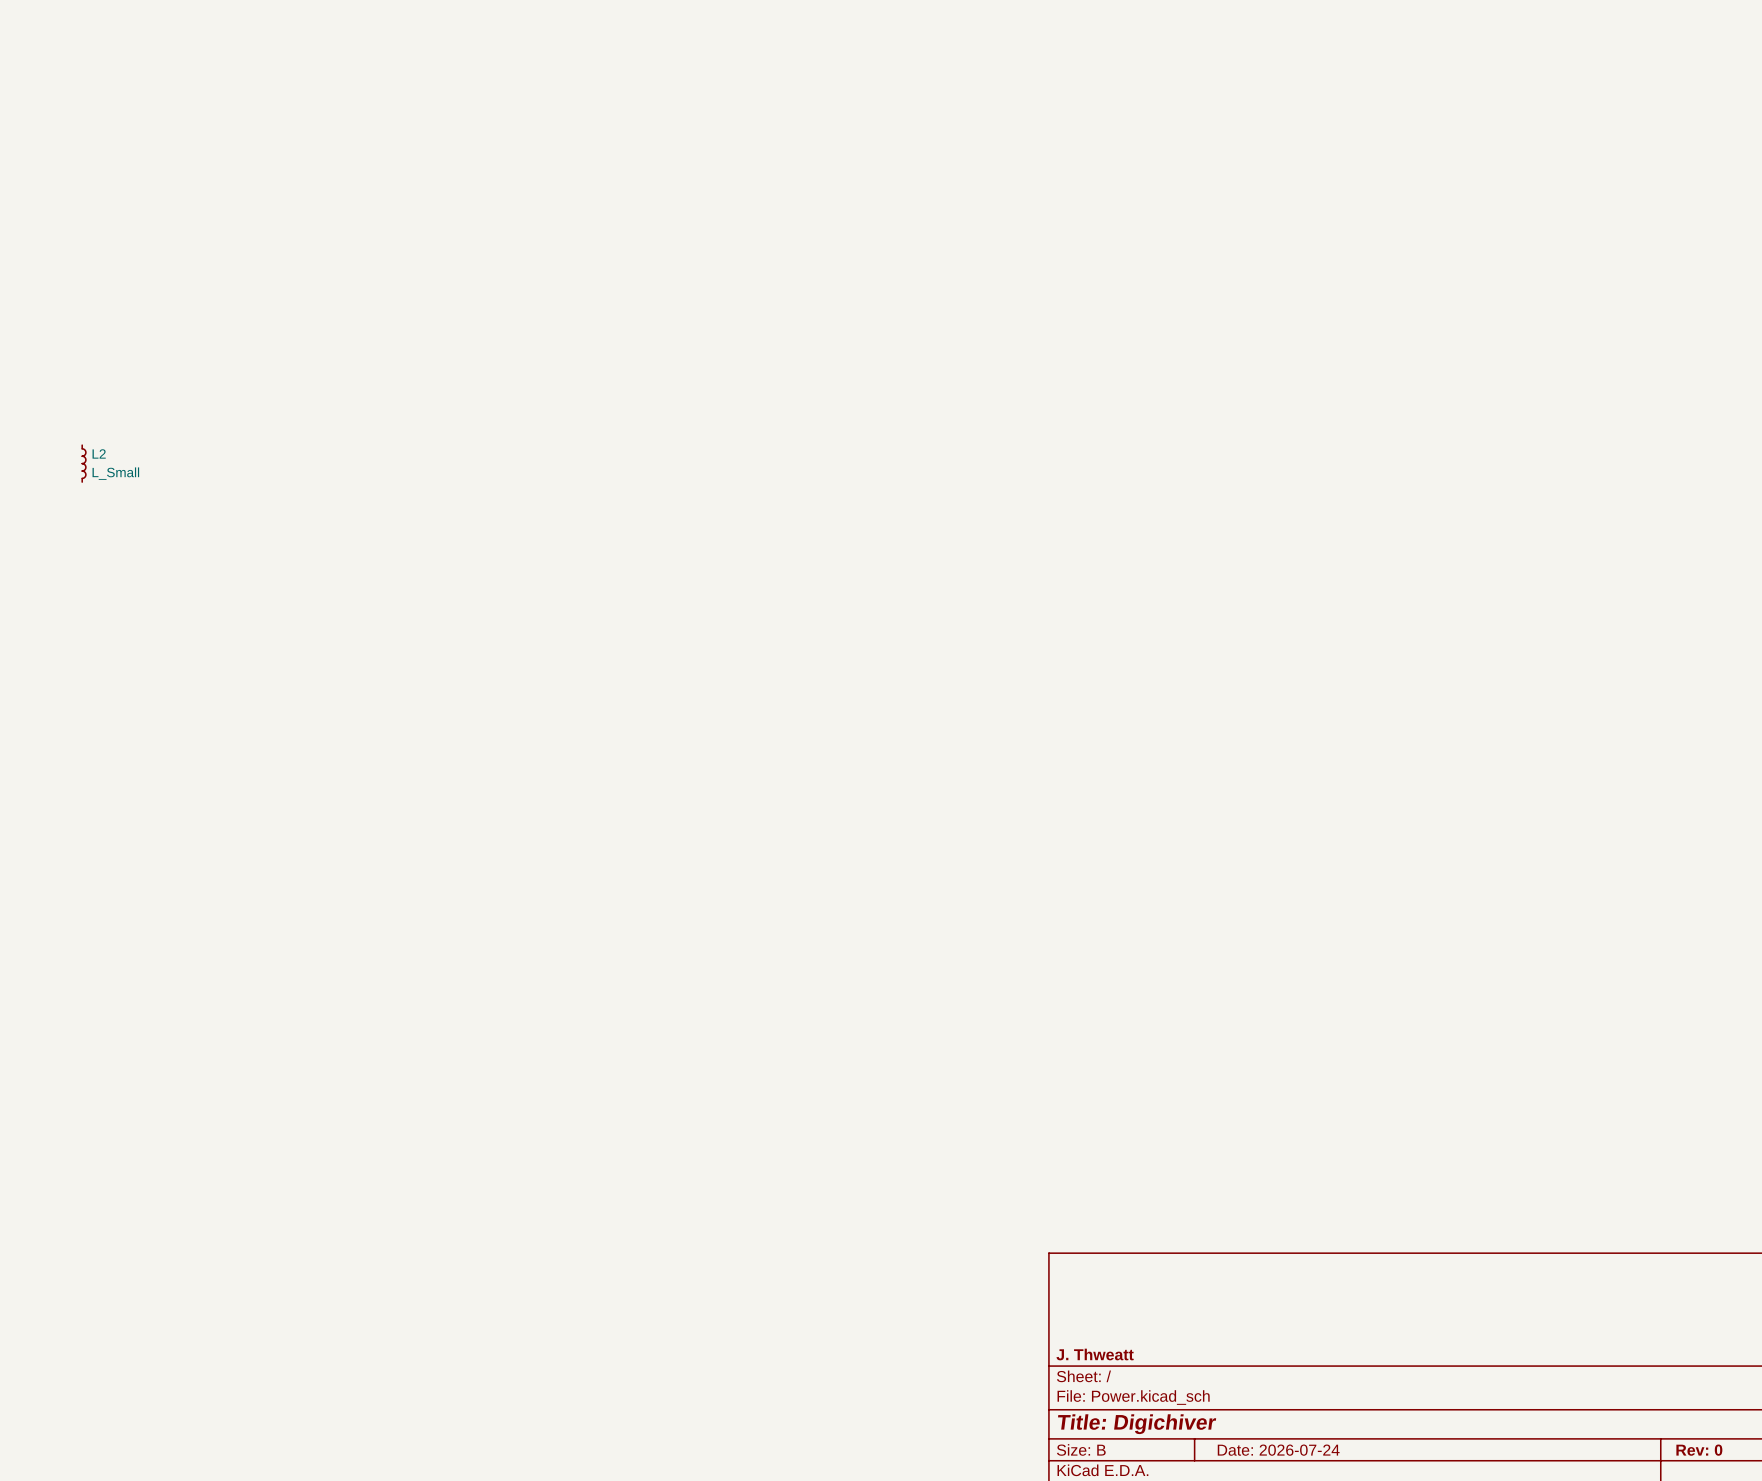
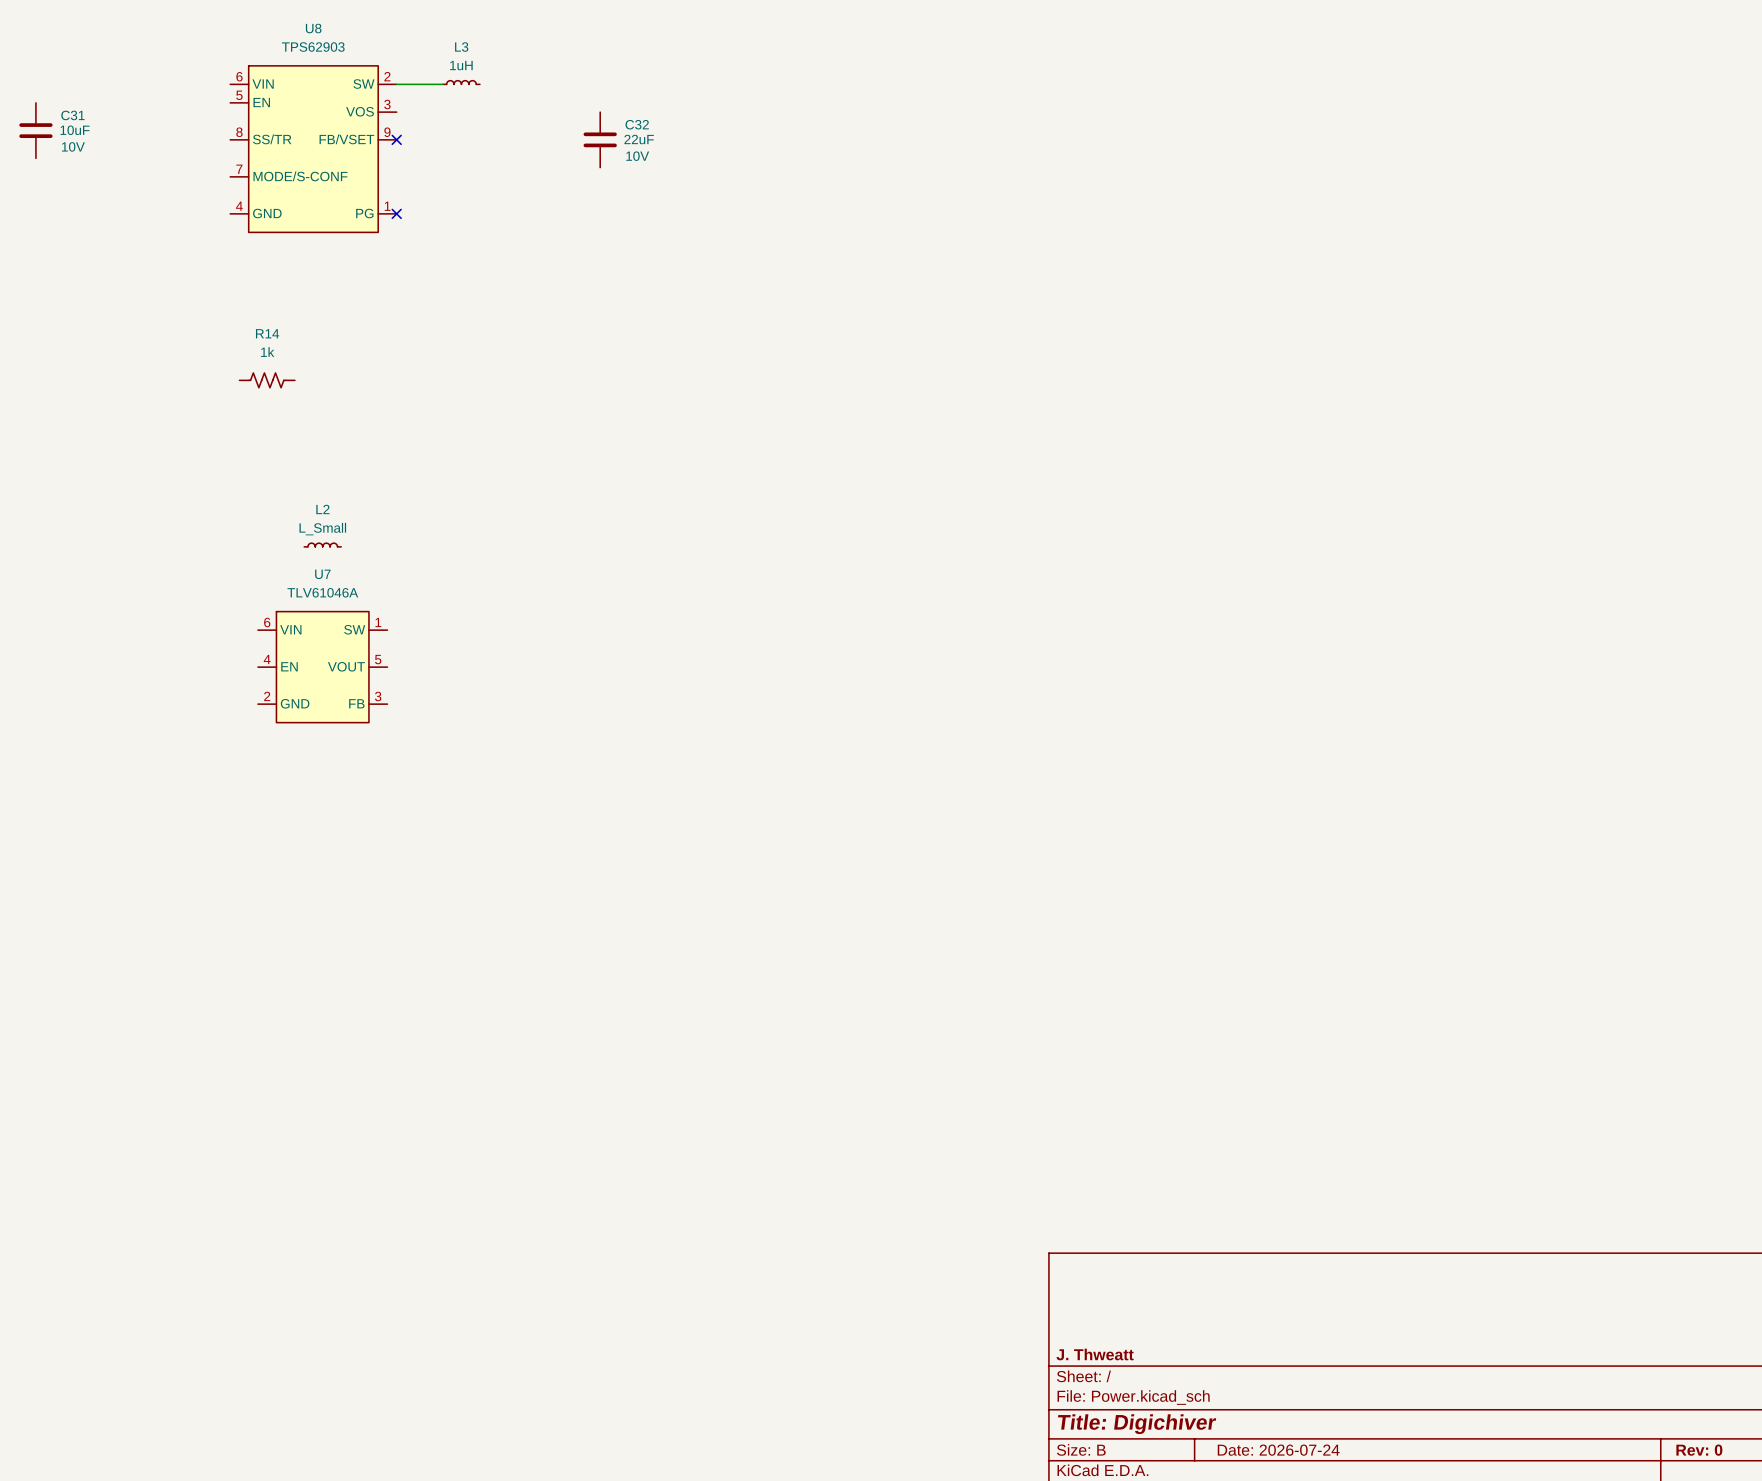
L3: none -> 1uH (461, 82)
wire: none -> (396, 84) (442, 84)
C31: none -> 10uF (35, 130)
no-connect mark: none -> (396, 139)
C32: none -> 22uF (600, 139)
U8: none -> TPS62903 (313, 149)
no-connect mark: none -> (396, 213)
R14: none -> 1k (267, 380)
L2 name position: L2 (99, 453) -> L2 (322, 509)
L2 rotation: 0° (84, 463) -> 90° counterclockwise (322, 545)
L2 position: (84, 463) -> (322, 545)
L2 value position: L_Small (115, 473) -> L_Small (322, 529)
U7: none -> TLV61046A (322, 667)

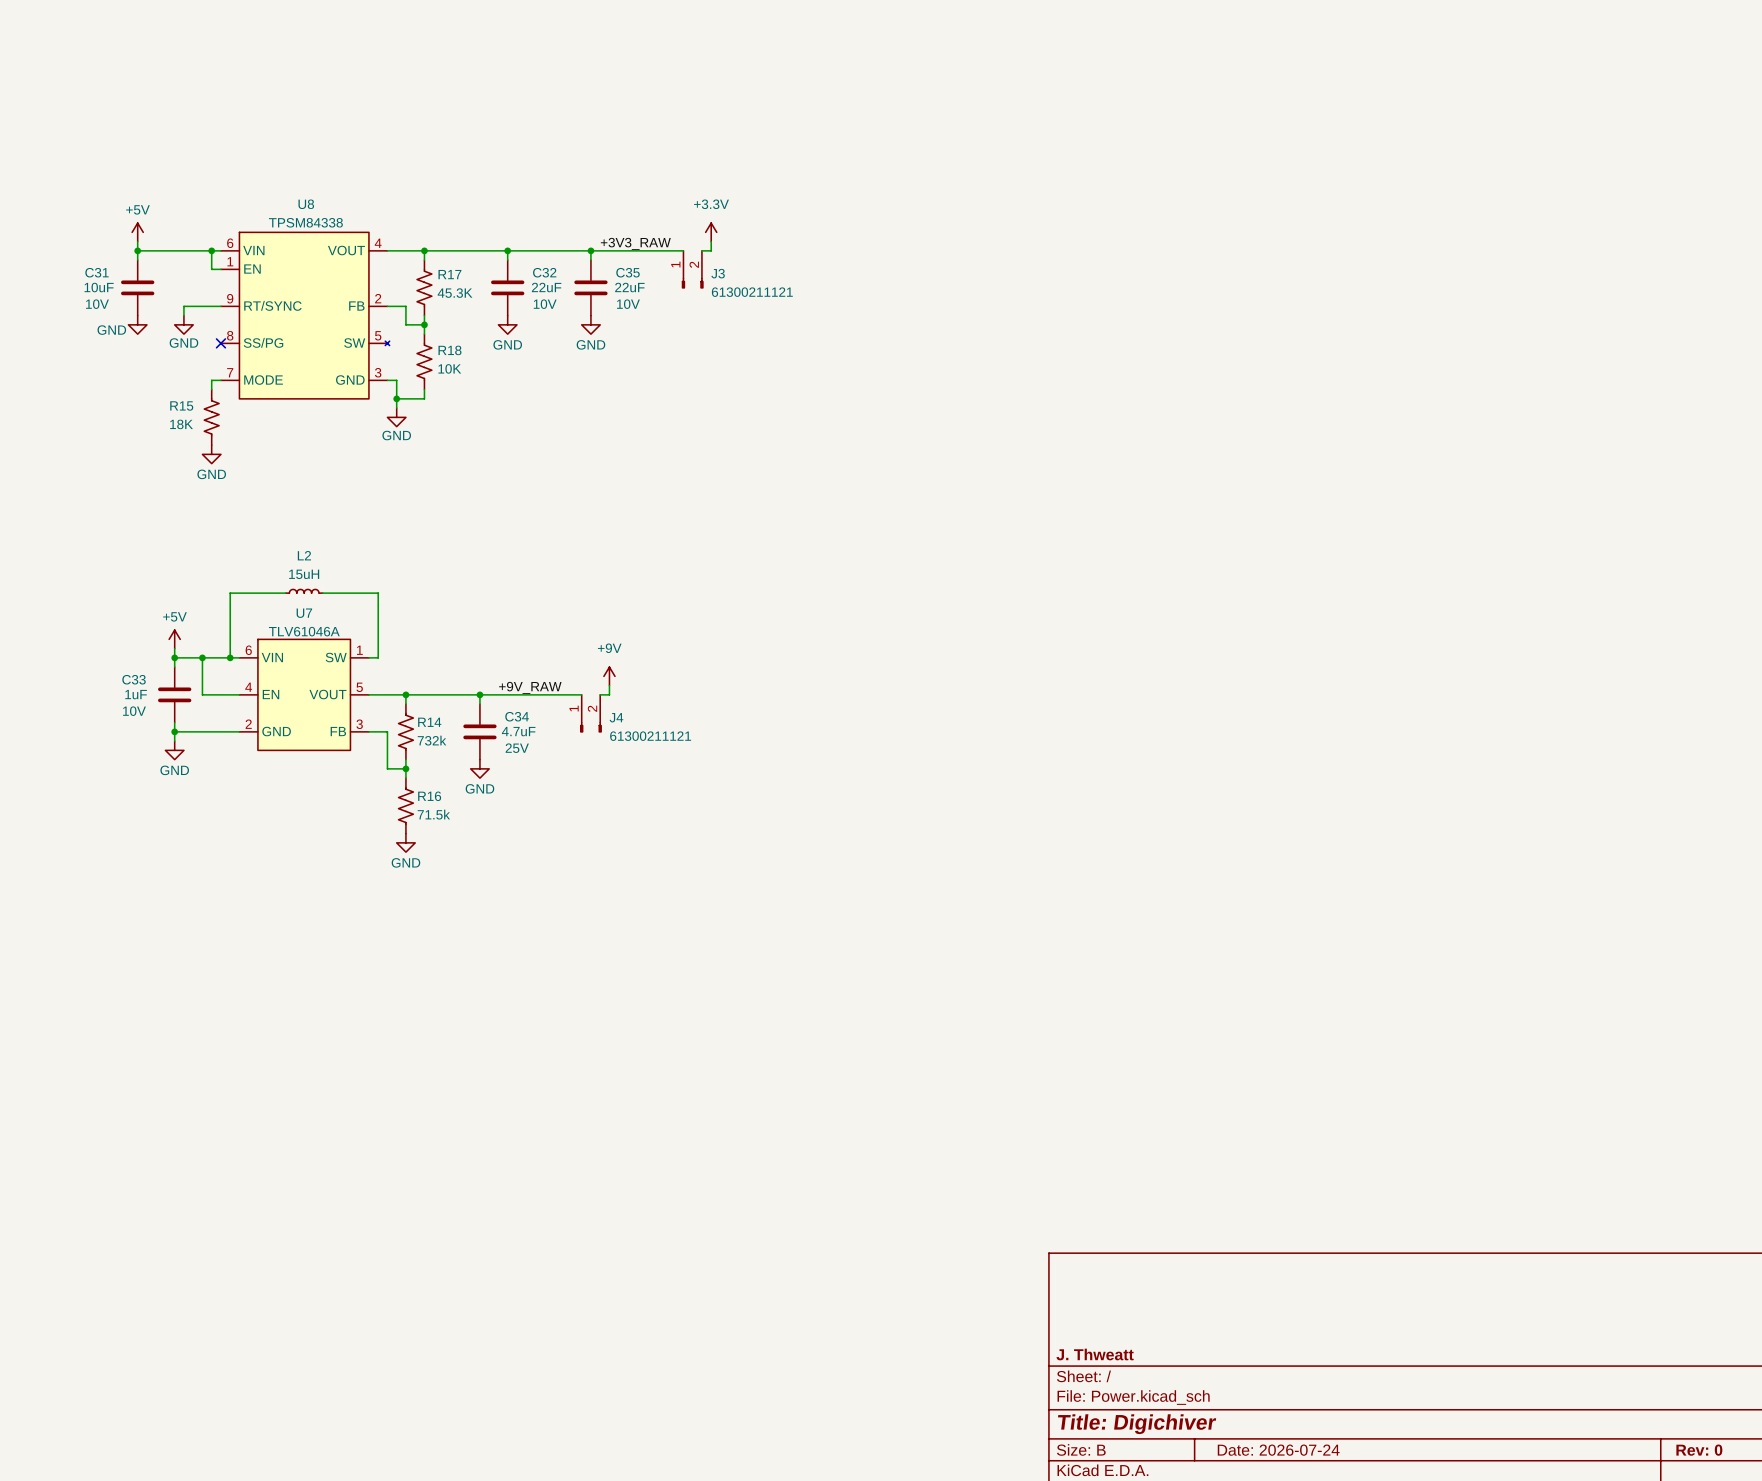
U8 value: TPS62903 (313, 47) -> TPSM84338 (305, 222)
U8 symbol: [230, 65, 397, 233] -> [220, 232, 390, 399]
L3: 1uH (461, 82) -> none
wire: (396, 84) (442, 84) -> none
C31 name position: C31 (72, 115) -> C31 (97, 272)
C31 position: (35, 130) -> (137, 287)
C31 value position: 10uF (75, 130) -> 10uF (99, 287)
no-connect mark: (396, 139) -> none
C32 position: (600, 139) -> (507, 287)
C31 text position: 10V (73, 146) -> 10V (97, 304)
no-connect mark: (396, 213) -> none
power symbol: none -> +5V (137, 232)
power symbol: none -> +3.3V (711, 232)
wire: none -> (137, 241) (137, 260)
wire: none -> (711, 241) (711, 250) (701, 250)
label: none -> +3V3_RAW (635, 243)
wire: none -> (137, 250) (220, 250)
junction: none -> (137, 250)
wire: none -> (211, 250) (211, 269) (220, 269)
junction: none -> (211, 250)
wire: none -> (387, 250) (683, 250)
wire: none -> (424, 250) (424, 260)
junction: none -> (424, 250)
wire: none -> (507, 250) (507, 260)
junction: none -> (507, 250)
wire: none -> (590, 250) (590, 260)
junction: none -> (590, 250)
J3: none -> 61300211121 (692, 269)
R17: none -> 45.3K (424, 287)
C35: none -> 22uF (590, 287)
wire: none -> (220, 306) (183, 306) (183, 315)
wire: none -> (387, 306) (405, 306) (405, 324) (424, 324)
wire: none -> (424, 315) (424, 334)
power symbol: none -> GND (137, 324)
power symbol: none -> GND (183, 324)
junction: none -> (424, 324)
power symbol: none -> GND (507, 324)
power symbol: none -> GND (590, 324)
R14 name position: R14 (267, 333) -> R14 (429, 722)
no-connect mark: none -> (220, 343)
R14 value: 1k (267, 352) -> 732k (431, 740)
R18: none -> 10K (424, 361)
wire: none -> (220, 380) (211, 380) (211, 389)
R14 rotation: 0° (267, 380) -> 90° clockwise (405, 731)
R14 position: (267, 380) -> (405, 731)
wire: none -> (387, 380) (396, 380) (396, 408)
wire: none -> (424, 389) (424, 398) (396, 398)
junction: none -> (396, 398)
R15: none -> 18K (211, 417)
power symbol: none -> GND (396, 417)
power symbol: none -> GND (211, 454)
L2 value: L_Small (322, 529) -> 15uH (304, 574)
L2 position: (322, 545) -> (304, 591)
U7 name position: U7 (322, 574) -> U7 (304, 613)
U7 value position: TLV61046A (322, 592) -> TLV61046A (304, 631)
wire: none -> (285, 593) (230, 593) (230, 657)
wire: none -> (322, 593) (378, 593) (378, 657) (368, 657)
power symbol: none -> +5V (174, 639)
wire: none -> (174, 648) (174, 667)
wire: none -> (174, 657) (239, 657)
junction: none -> (174, 657)
wire: none -> (202, 657) (202, 694) (239, 694)
junction: none -> (202, 657)
junction: none -> (230, 657)
U7 position: (322, 667) -> (304, 694)
power symbol: none -> +9V (609, 676)
wire: none -> (609, 685) (609, 694) (600, 694)
label: none -> +9V_RAW (530, 687)
C33: none -> 1uF (174, 694)
wire: none -> (368, 694) (581, 694)
wire: none -> (405, 694) (405, 704)
junction: none -> (405, 694)
wire: none -> (479, 694) (479, 704)
junction: none -> (479, 694)
J4: none -> 61300211121 (590, 713)
wire: none -> (174, 722) (174, 741)
wire: none -> (174, 731) (239, 731)
junction: none -> (174, 731)
wire: none -> (368, 731) (387, 731) (387, 768) (405, 768)
C34: none -> 4.7uF (479, 731)
power symbol: none -> GND (174, 750)
wire: none -> (405, 759) (405, 778)
junction: none -> (405, 768)
power symbol: none -> GND (479, 768)
R16: none -> 71.5k (405, 805)
power symbol: none -> GND (405, 842)

